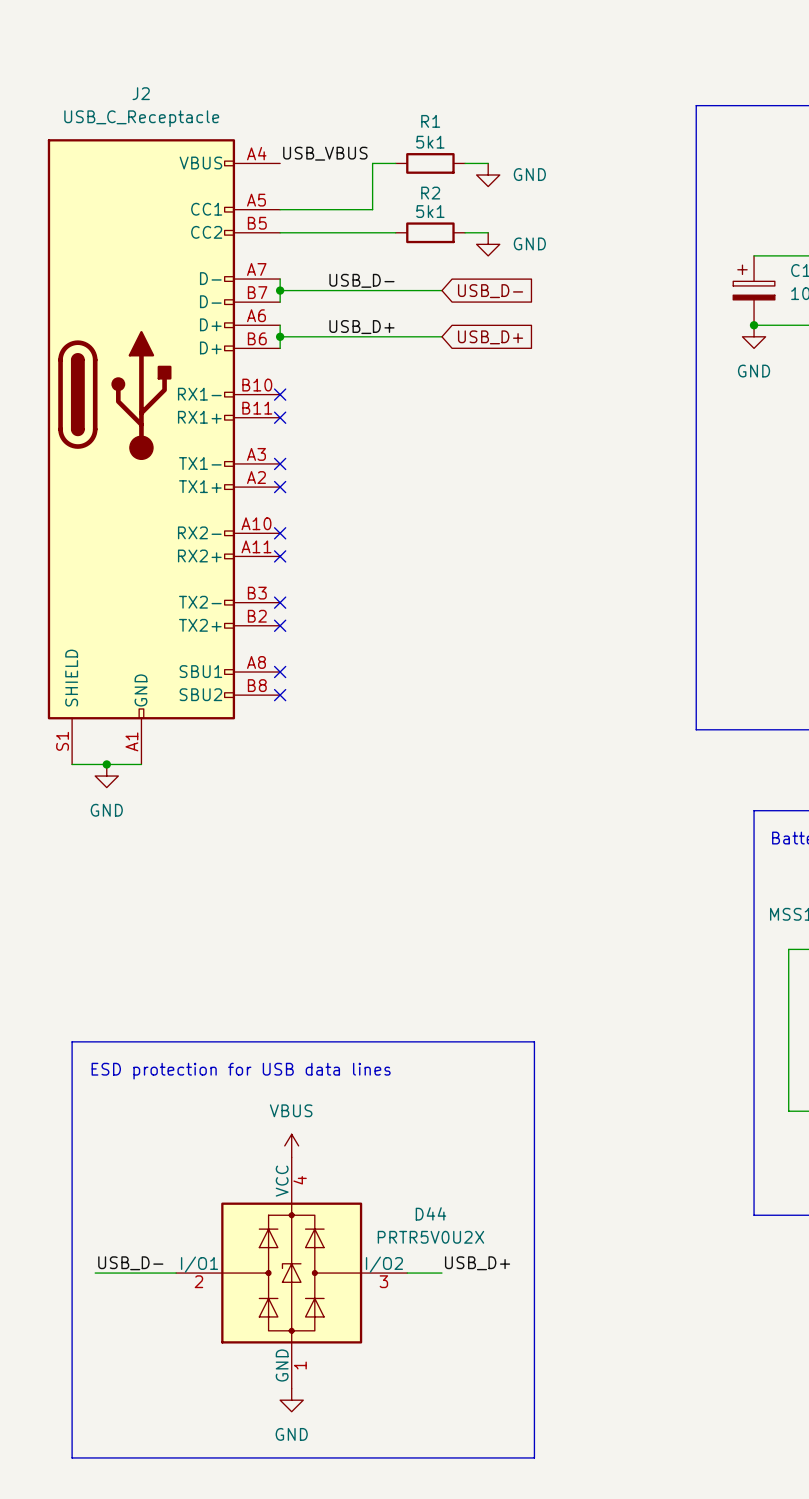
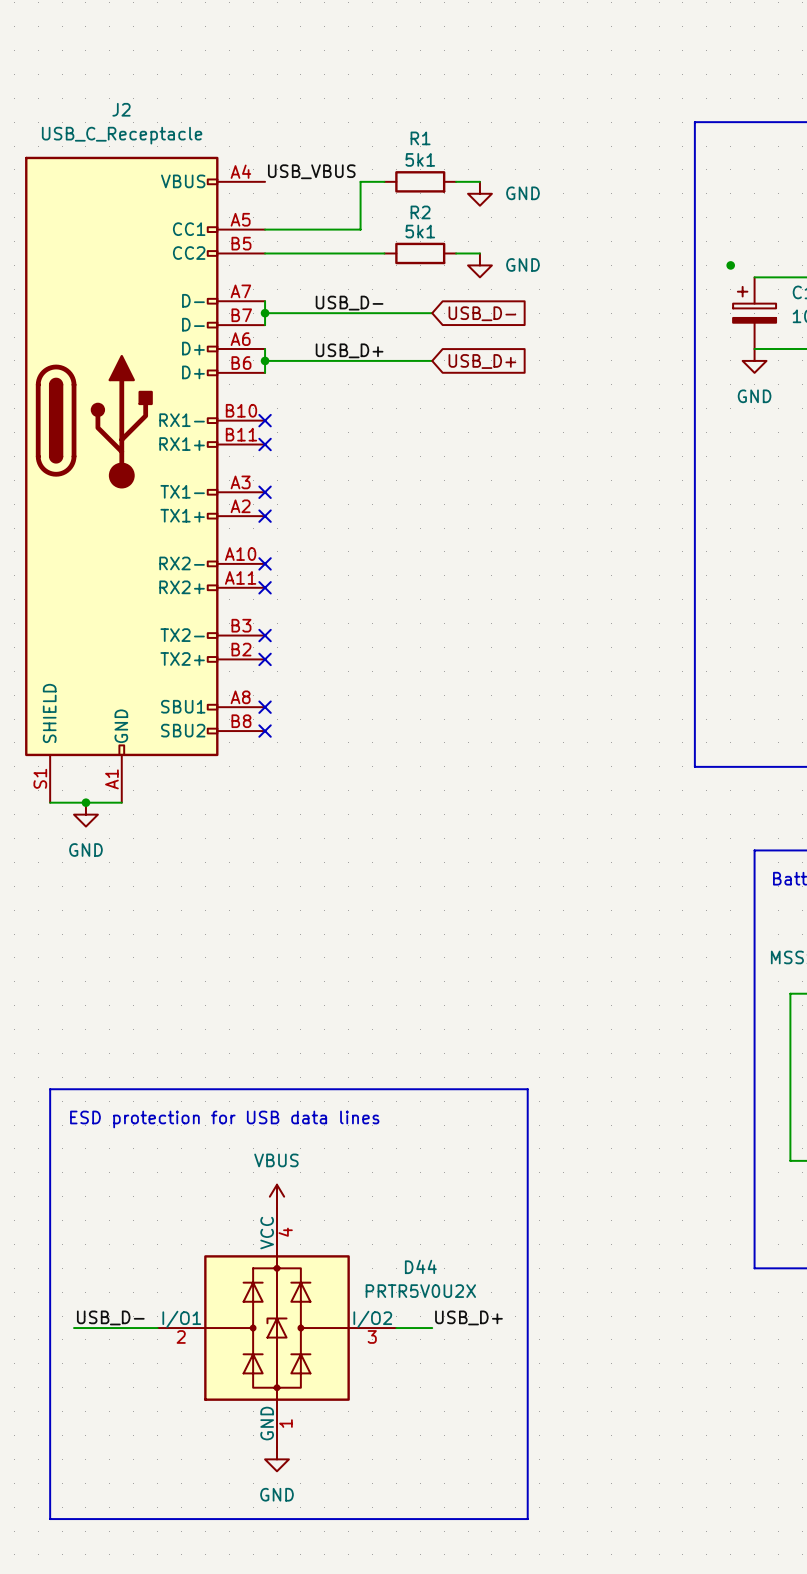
junction: none -> (730, 265)
junction: (754, 325) -> none

